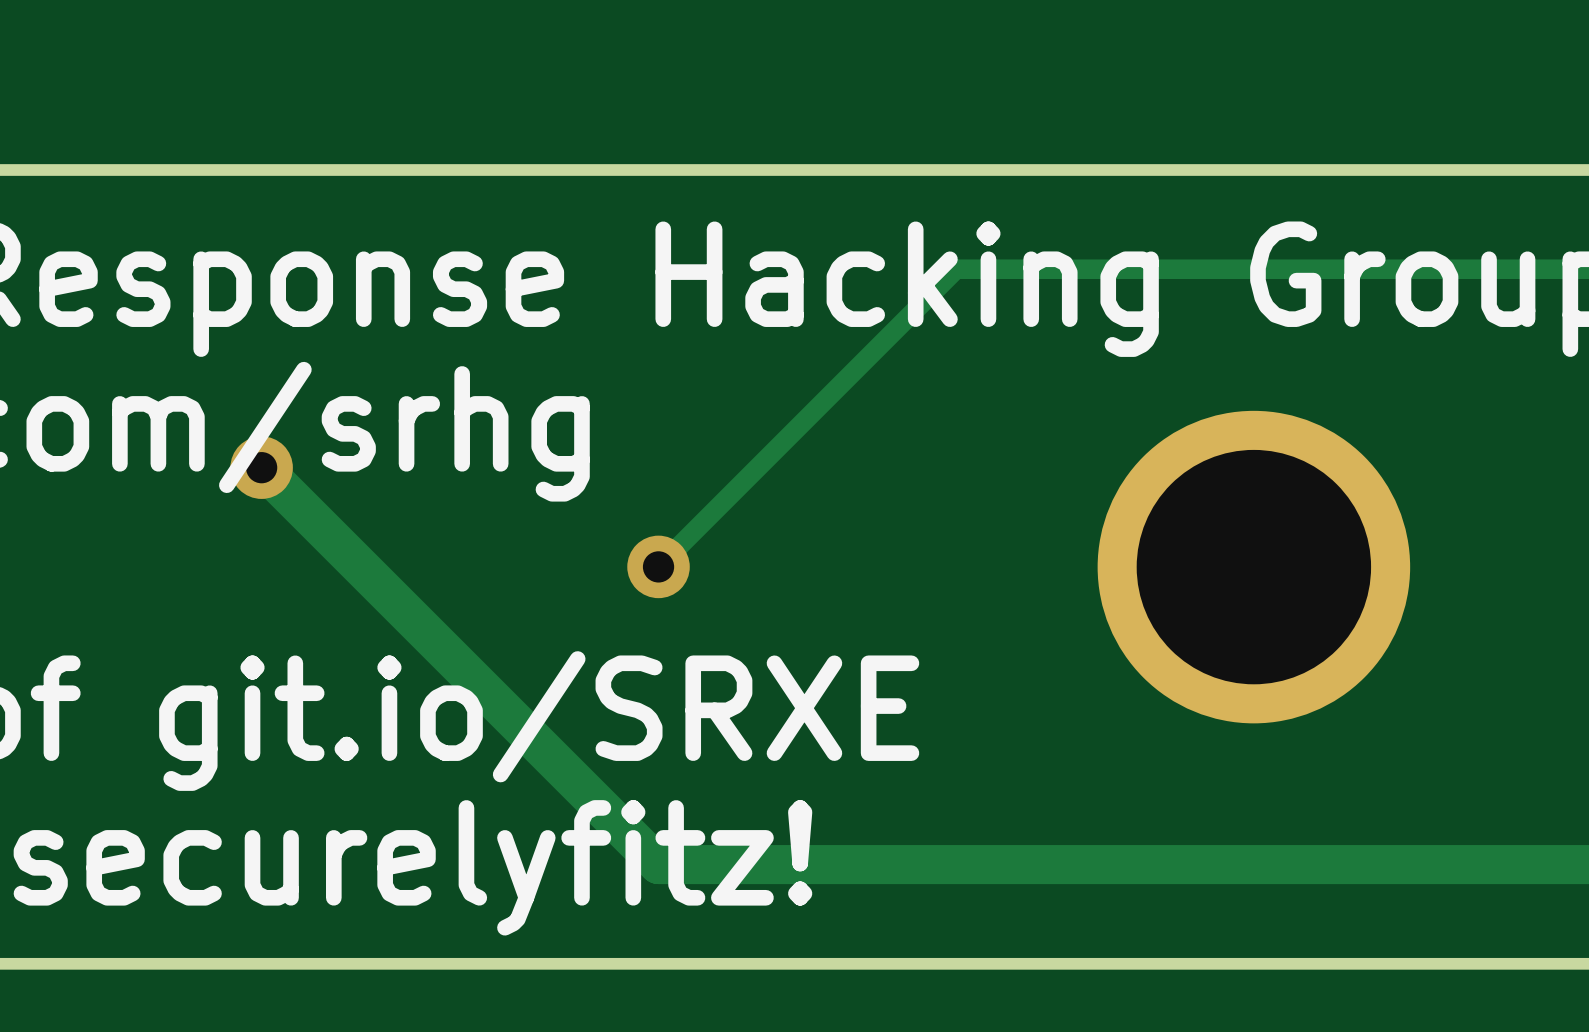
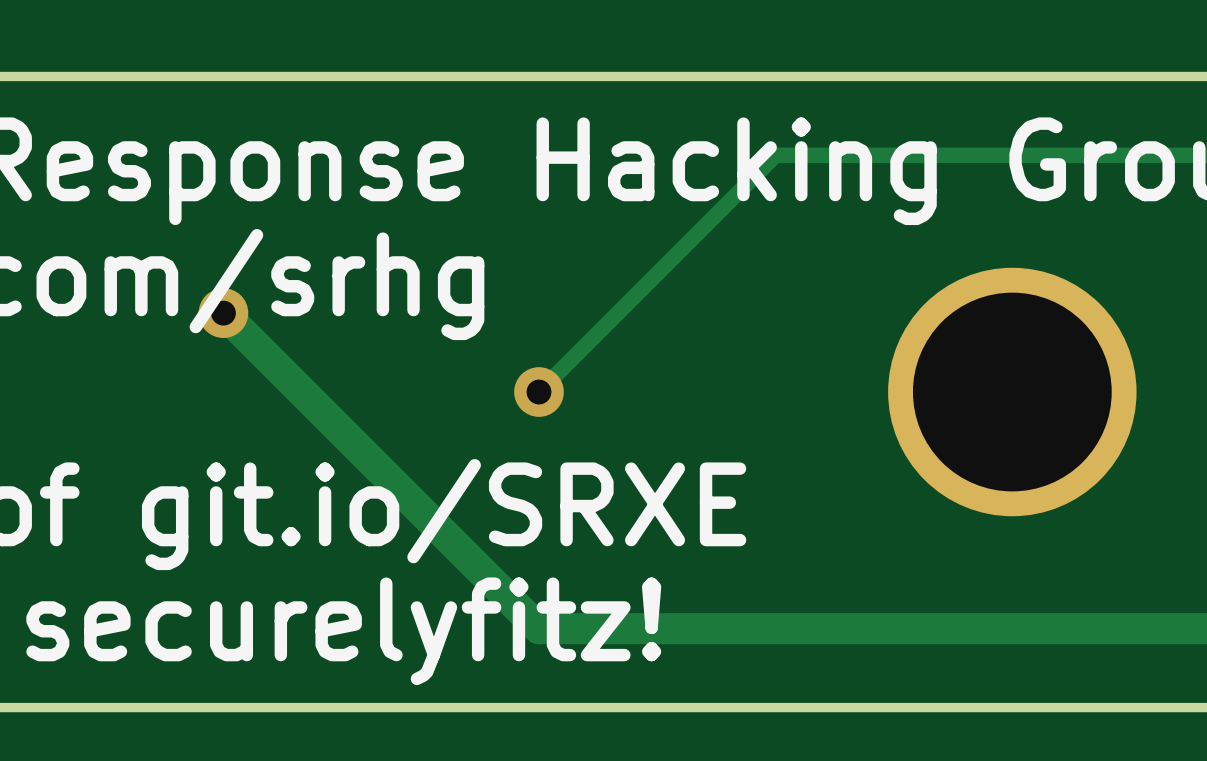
part footprint: [1097, 410, 1411, 724] -> [888, 267, 1137, 517]

